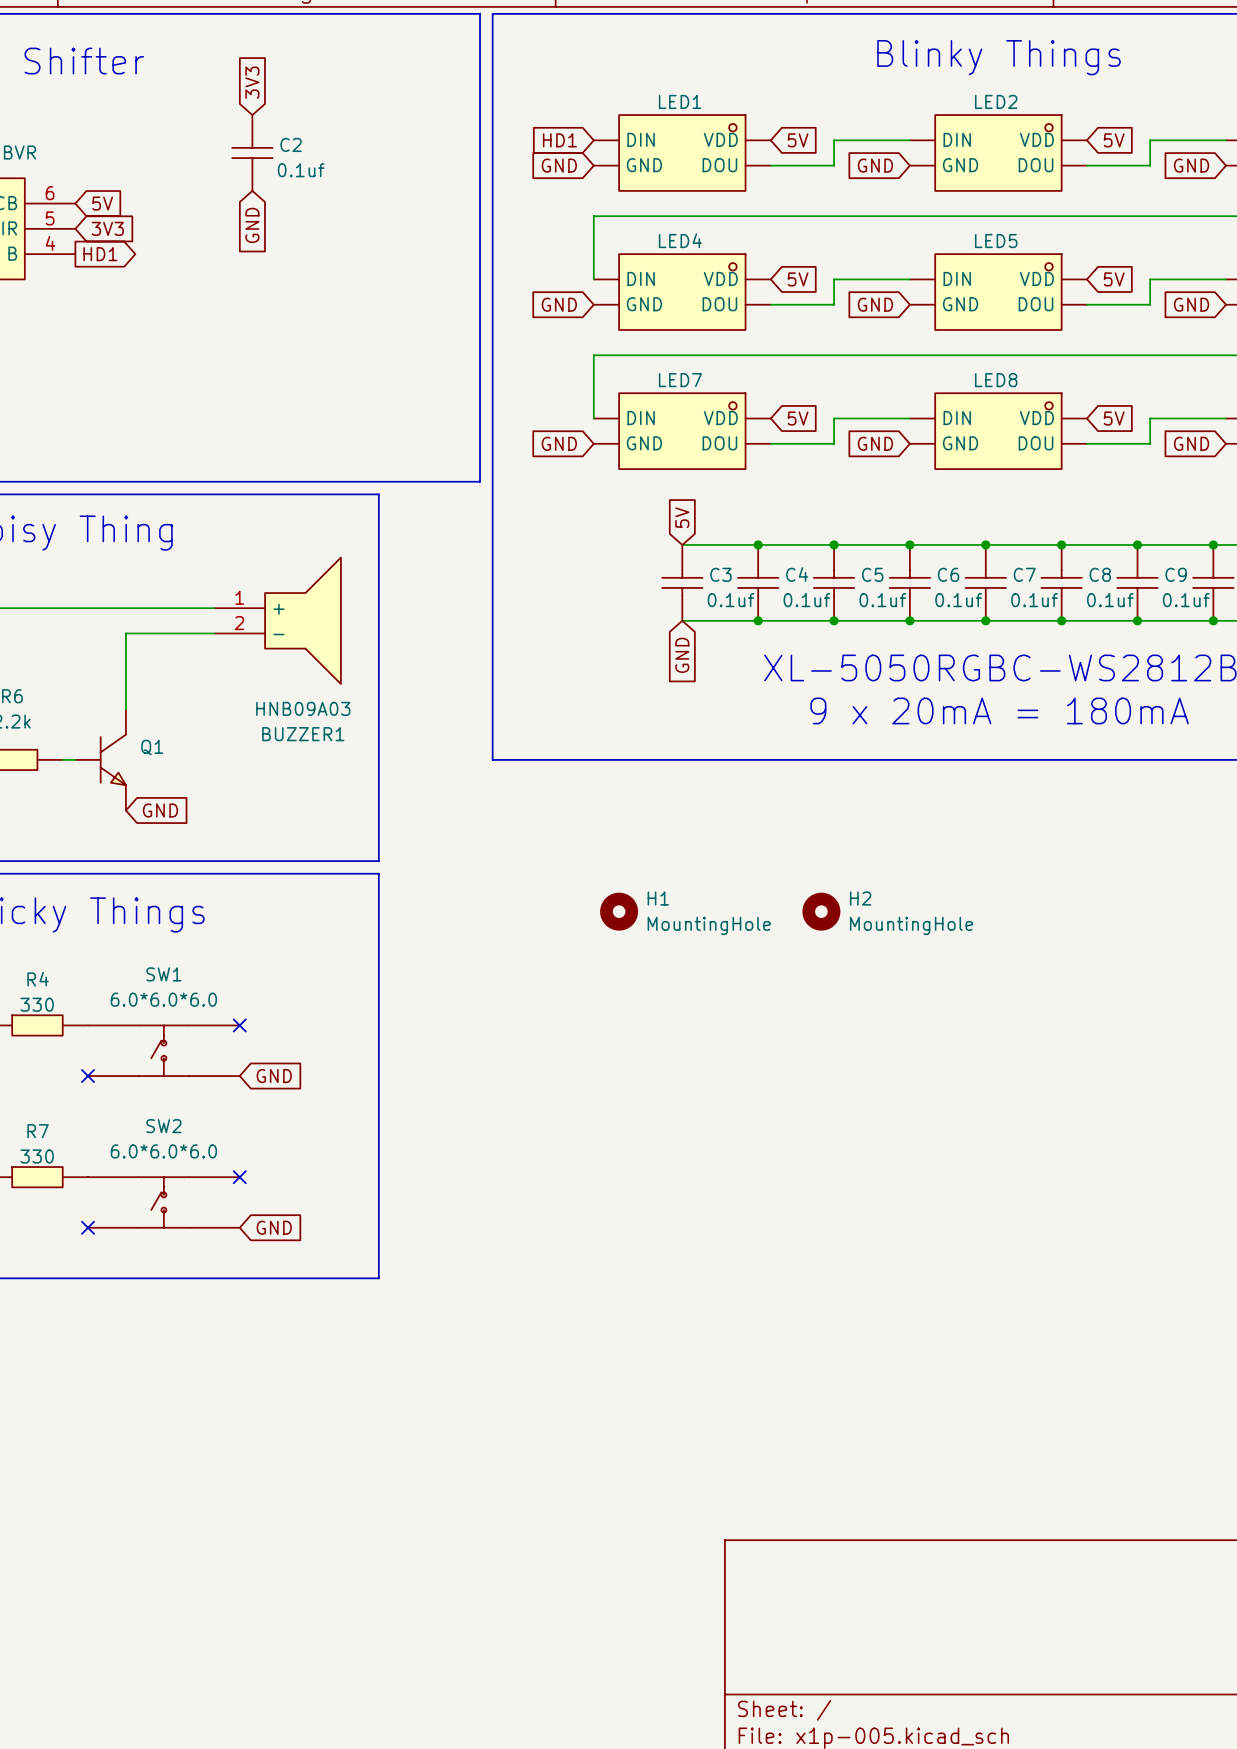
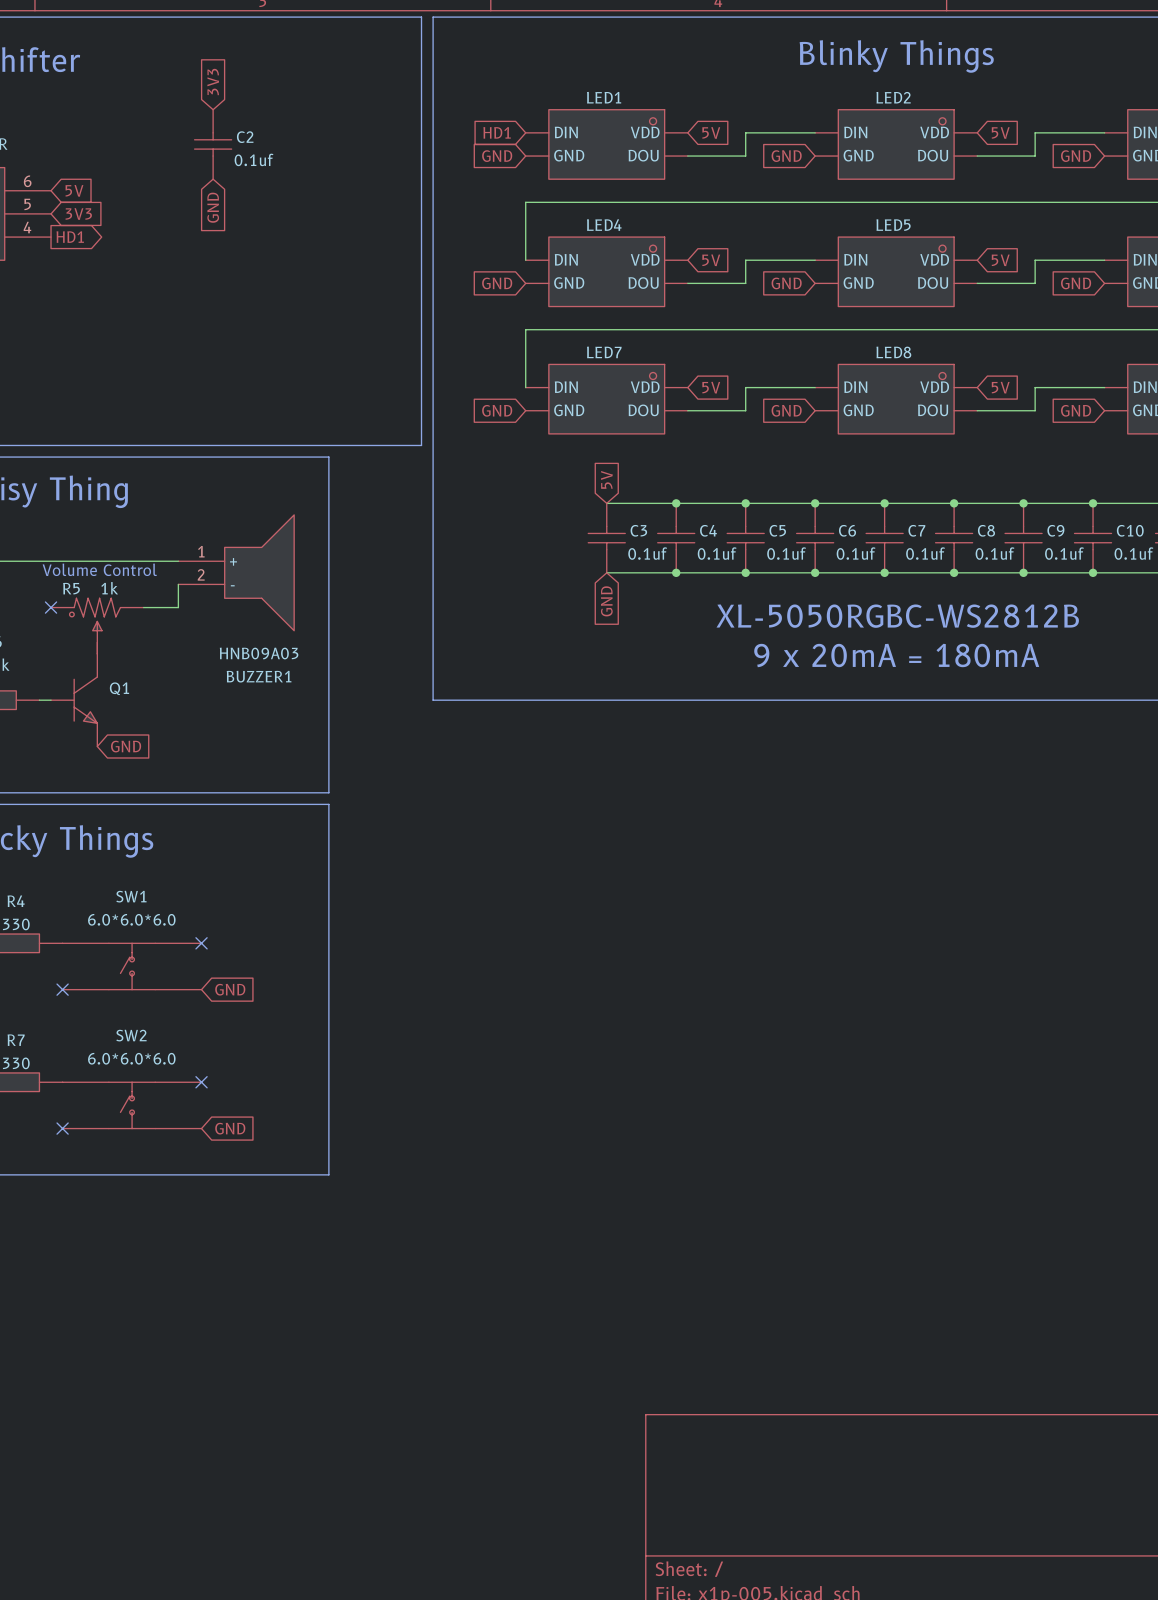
text: none -> Volume Control (99, 569)
wire: (214, 633) (125, 633) (125, 709) -> (178, 584) (178, 607) (143, 607)
no-connect mark: none -> (51, 607)
R5: none -> 1k (97, 626)
H1: MountingHole (619, 911) -> none
H2: MountingHole (821, 911) -> none

